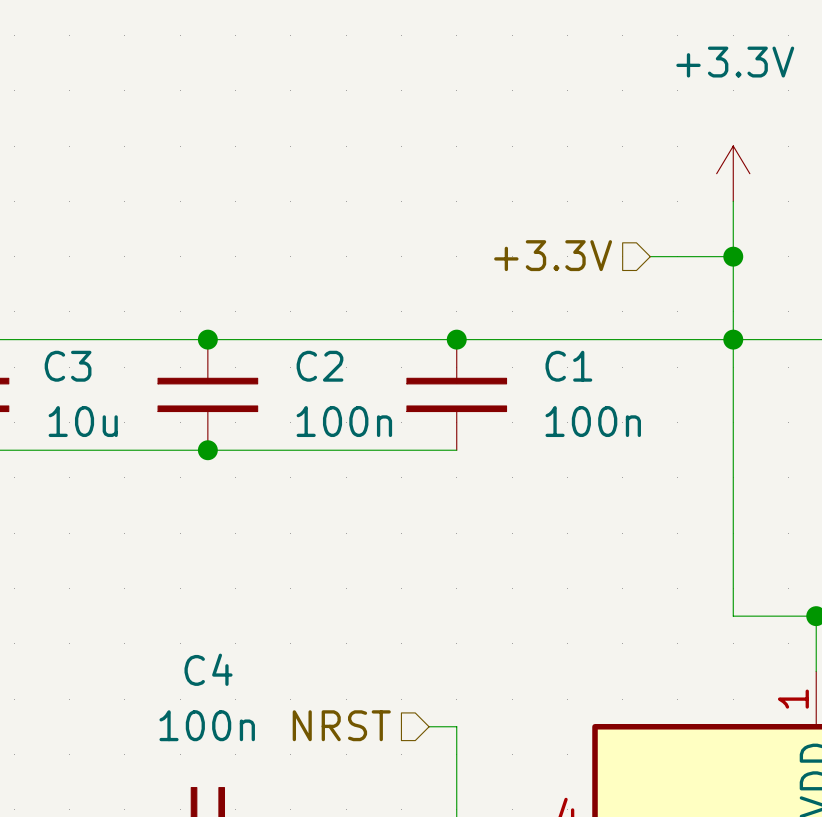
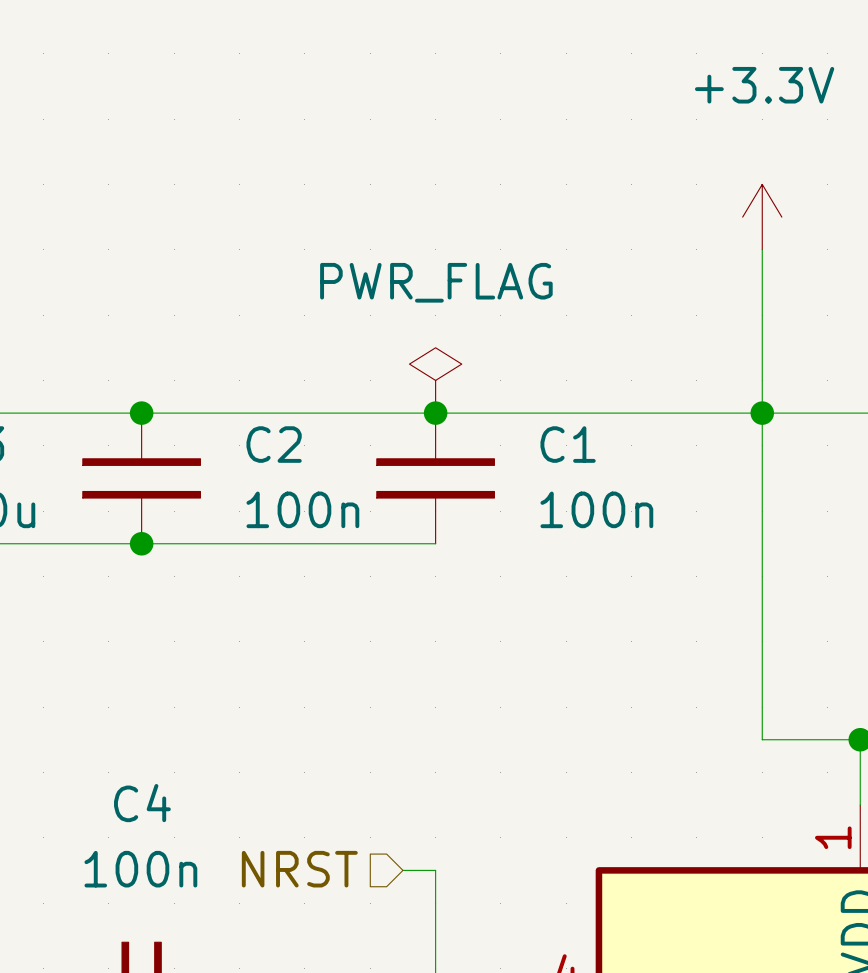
hierarchical label: +3.3V (553, 255) -> none
wire: (650, 256) (733, 256) -> none
junction: (733, 256) -> none
power symbol: none -> PWR_FLAG (435, 380)

